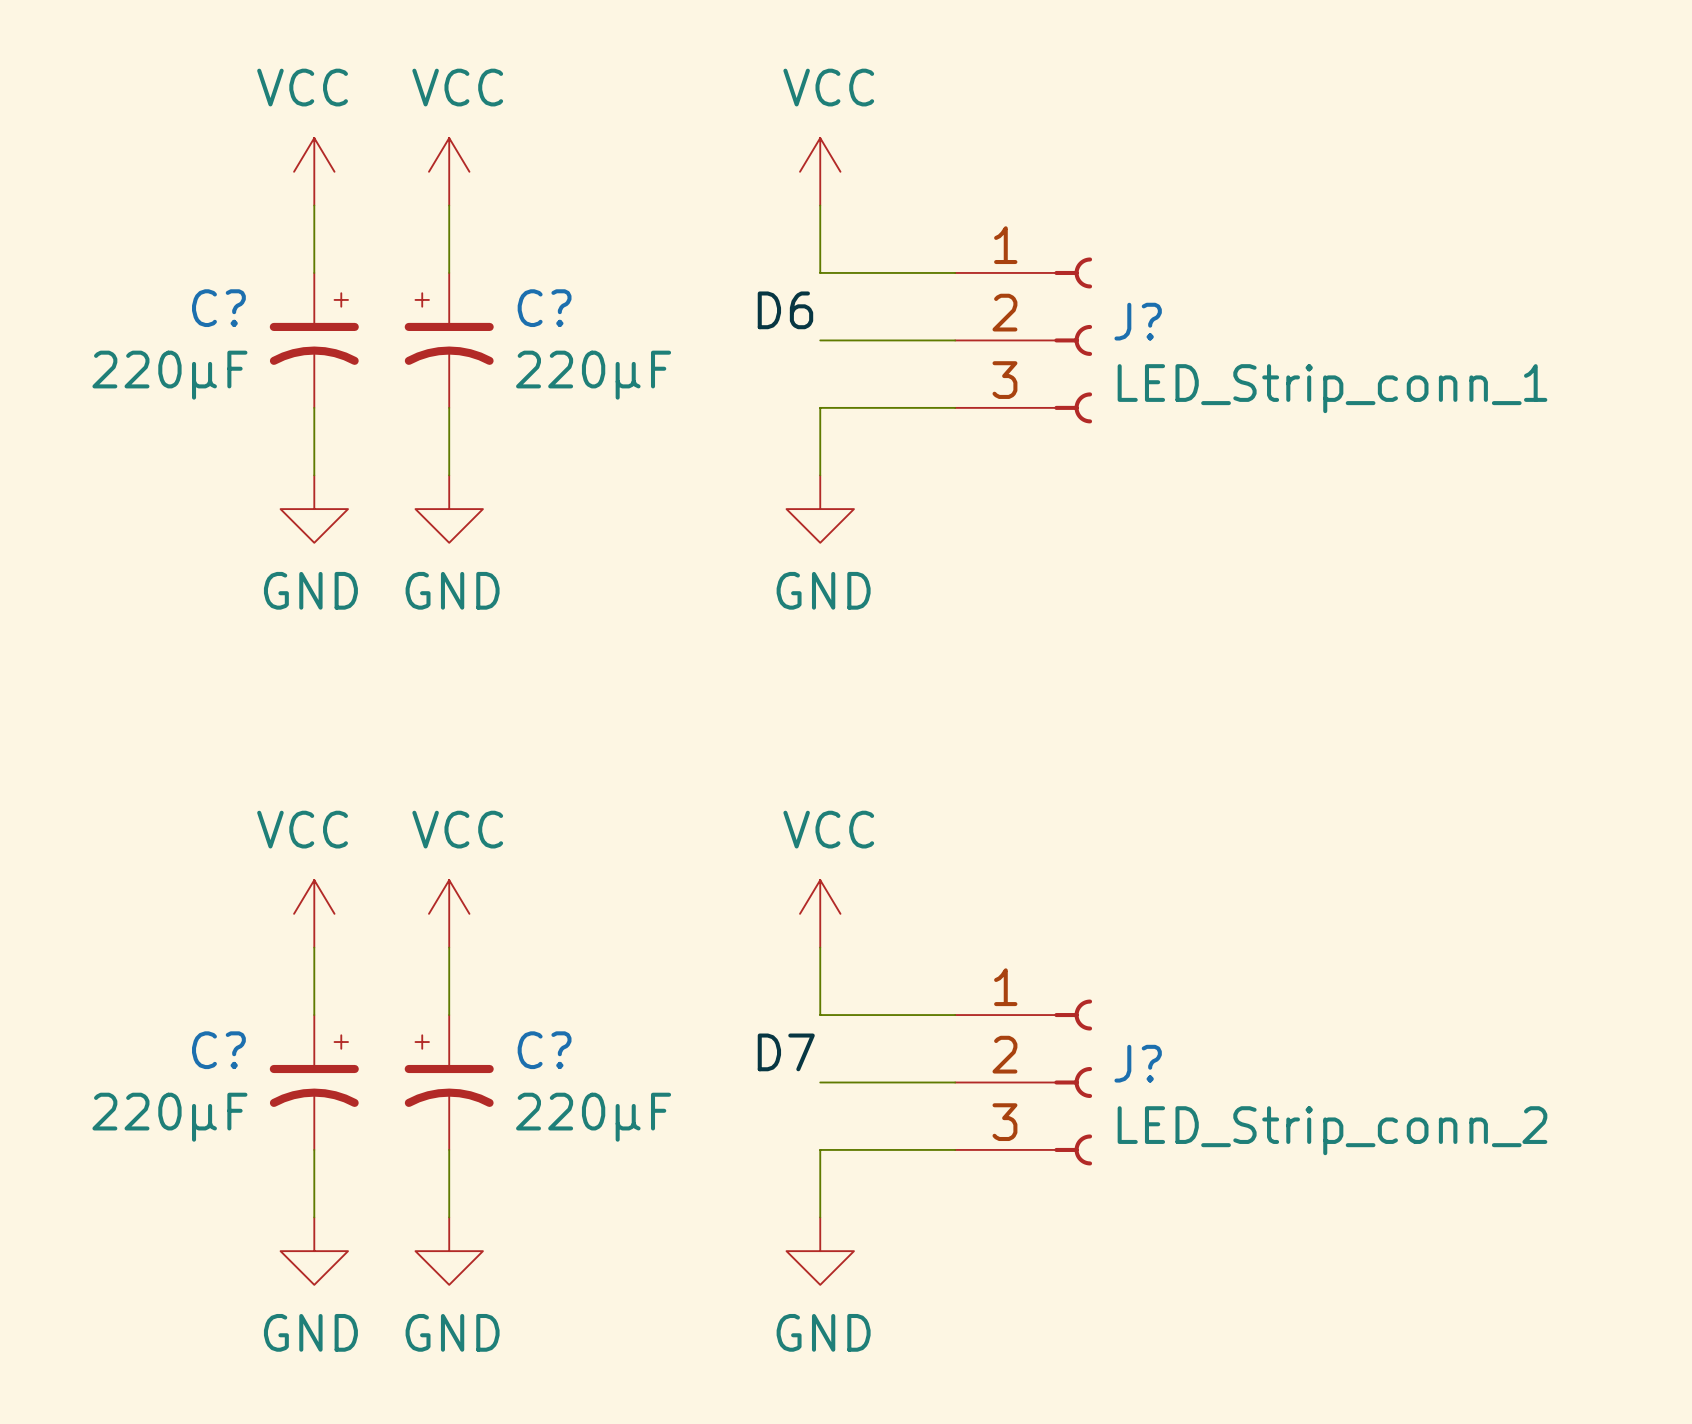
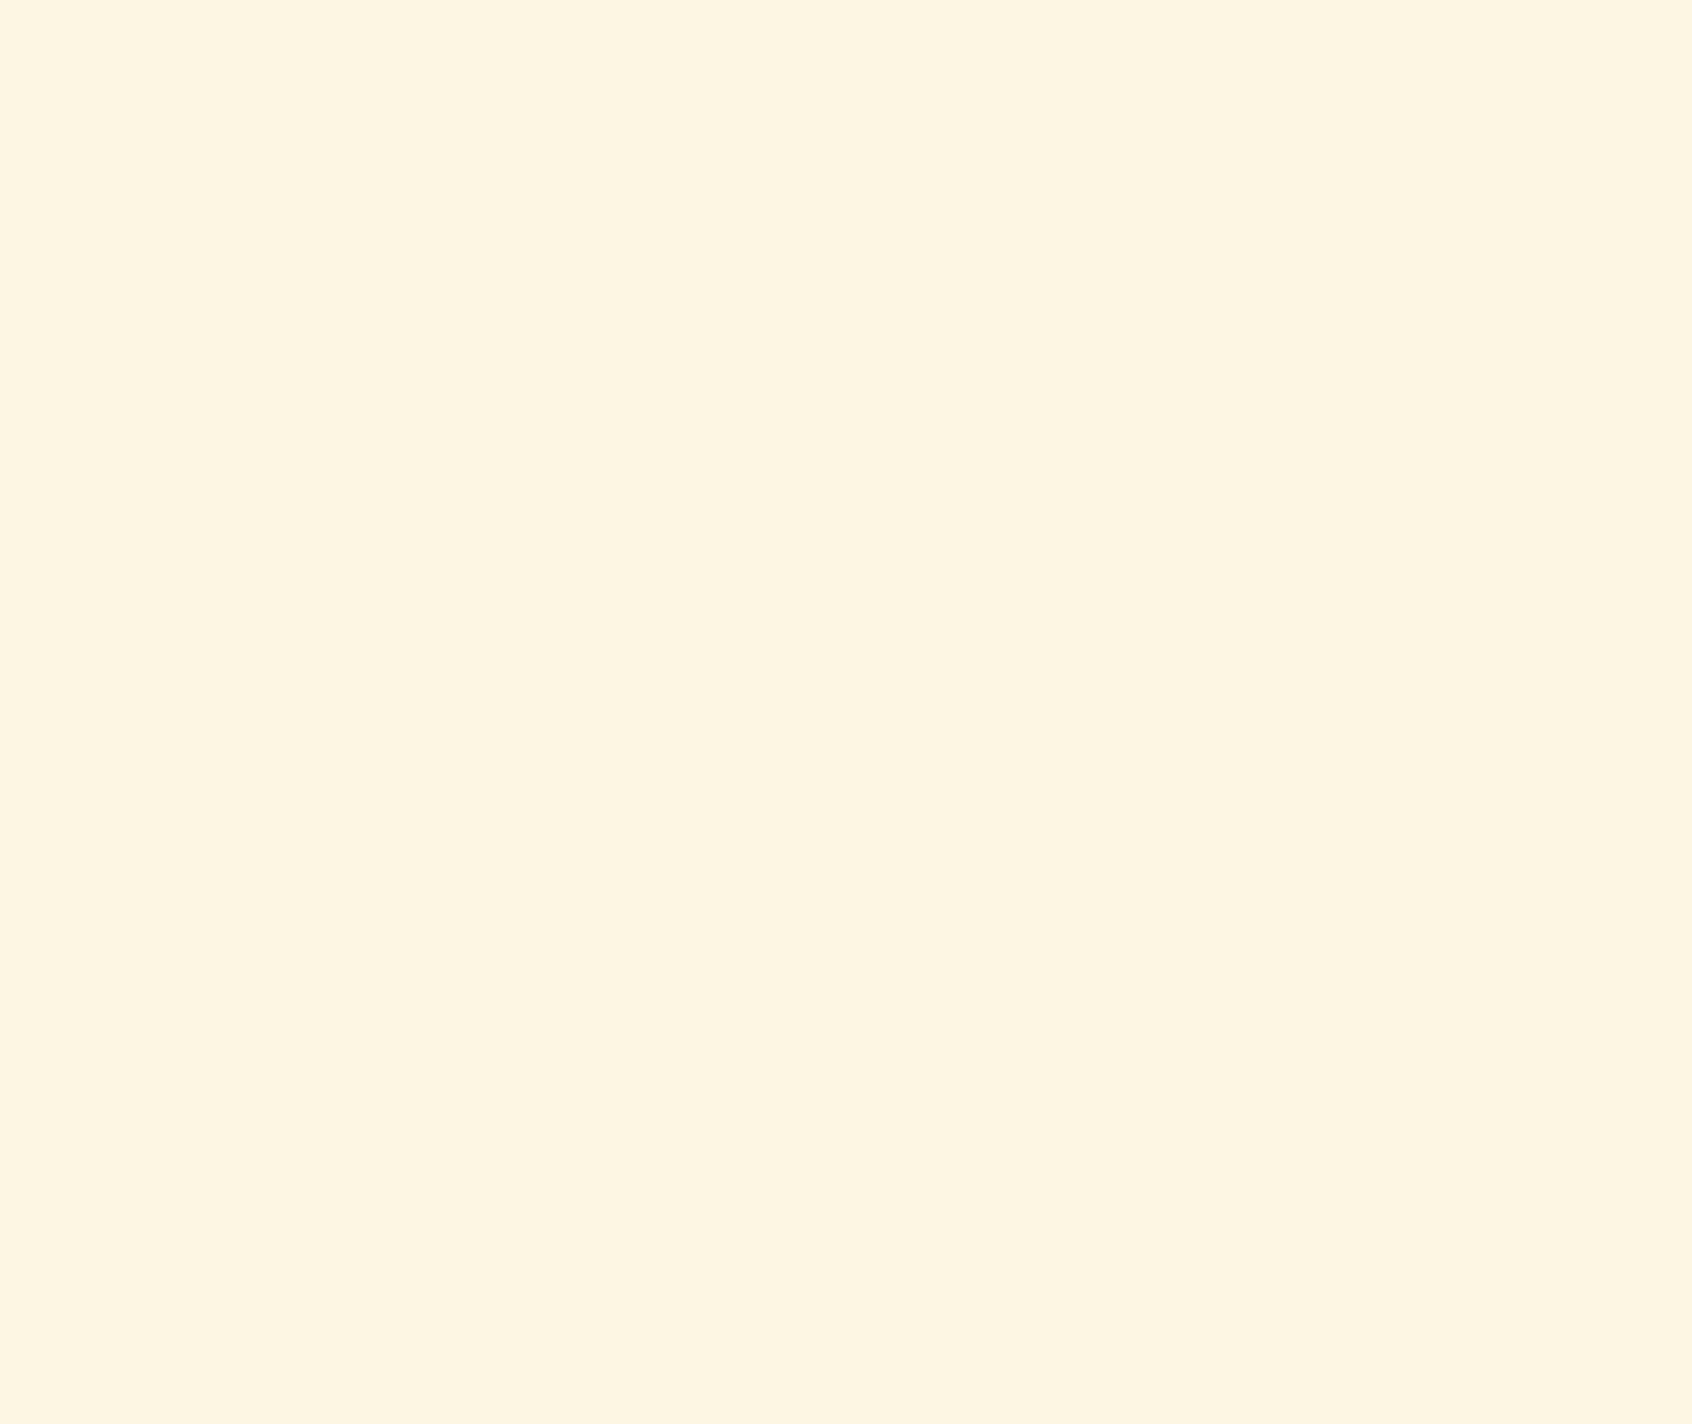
power symbol: VCC (314, 171) -> none
power symbol: VCC (449, 171) -> none
power symbol: VCC (820, 171) -> none
wire: (314, 205) (314, 272) -> none
wire: (449, 205) (449, 272) -> none
wire: (820, 205) (820, 272) (955, 272) -> none
label: D6 (785, 310) -> none
C?: 220μF (314, 340) -> none
C?: 220μF (449, 340) -> none
wire: (820, 340) (955, 340) -> none
J?: LED_Strip_conn_1 (1023, 340) -> none
wire: (314, 407) (314, 475) -> none
wire: (449, 407) (449, 475) -> none
wire: (955, 407) (820, 407) (820, 475) -> none
power symbol: GND (314, 509) -> none
power symbol: GND (449, 509) -> none
power symbol: GND (820, 509) -> none
power symbol: VCC (314, 913) -> none
power symbol: VCC (449, 913) -> none
power symbol: VCC (820, 913) -> none
wire: (314, 947) (314, 1015) -> none
wire: (449, 947) (449, 1015) -> none
wire: (820, 947) (820, 1015) (955, 1015) -> none
label: D7 (786, 1052) -> none
C?: 220μF (314, 1082) -> none
C?: 220μF (449, 1082) -> none
wire: (820, 1082) (955, 1082) -> none
J?: LED_Strip_conn_2 (1023, 1082) -> none
wire: (314, 1149) (314, 1217) -> none
wire: (449, 1149) (449, 1217) -> none
wire: (955, 1149) (820, 1149) (820, 1217) -> none
power symbol: GND (314, 1251) -> none
power symbol: GND (449, 1251) -> none
power symbol: GND (820, 1251) -> none

